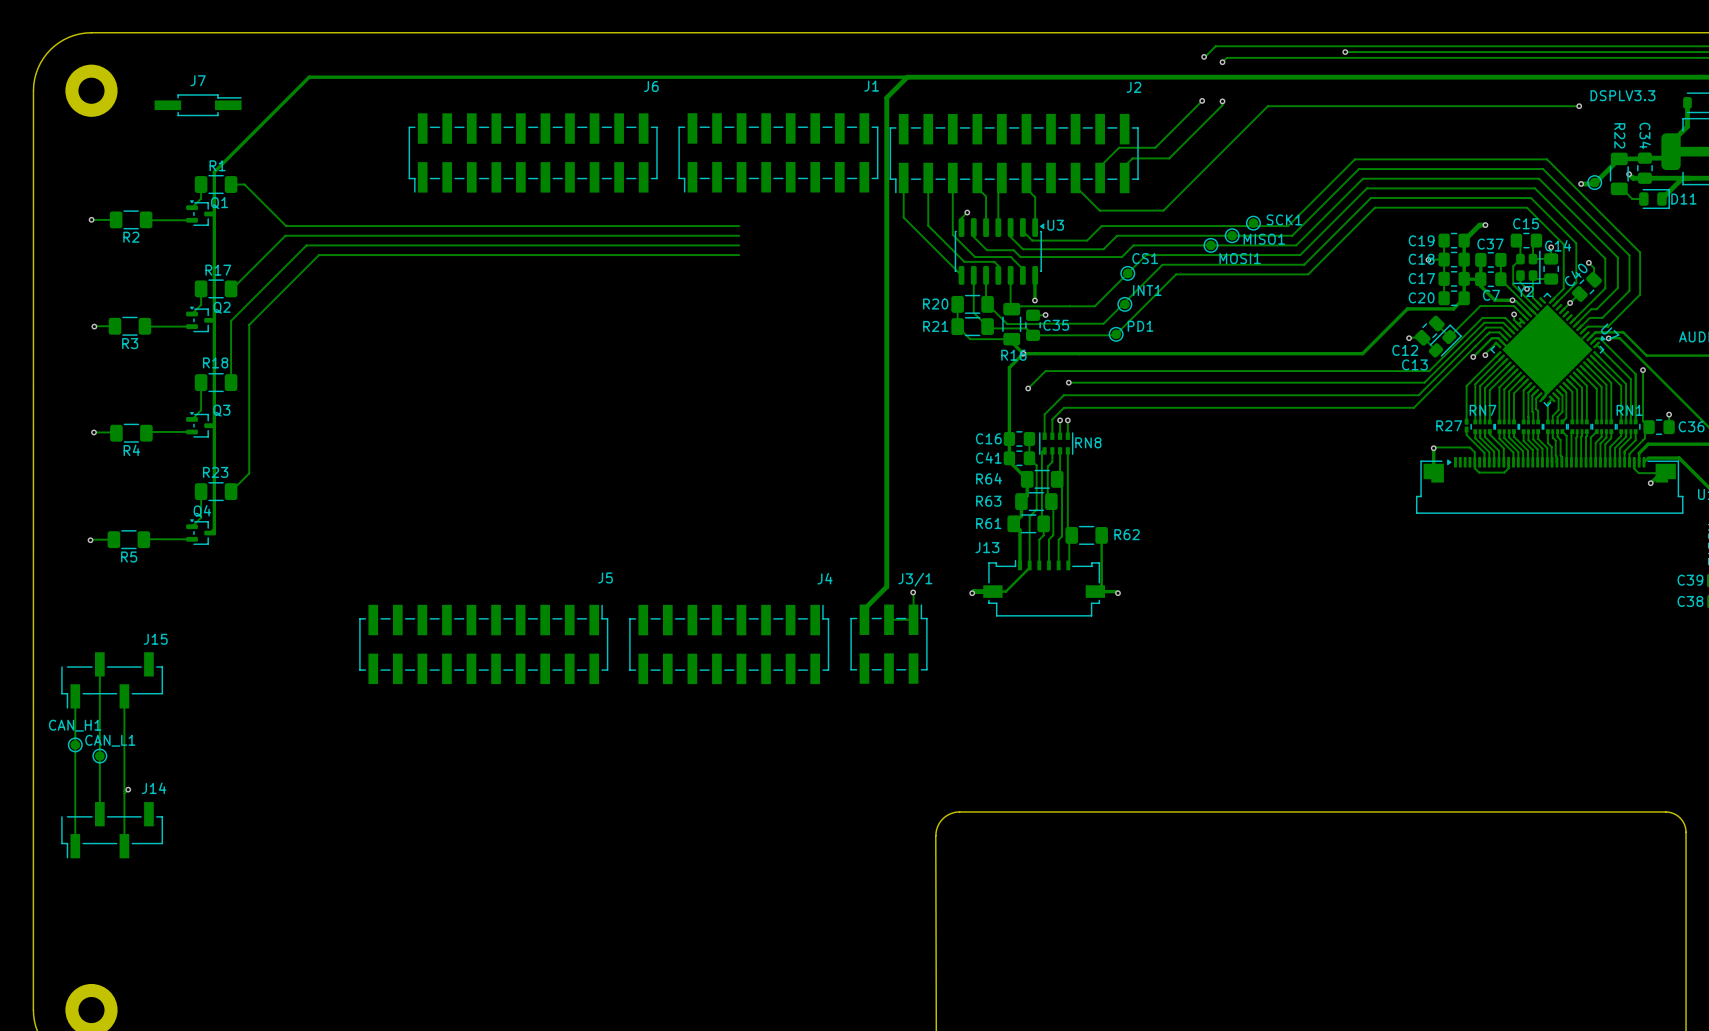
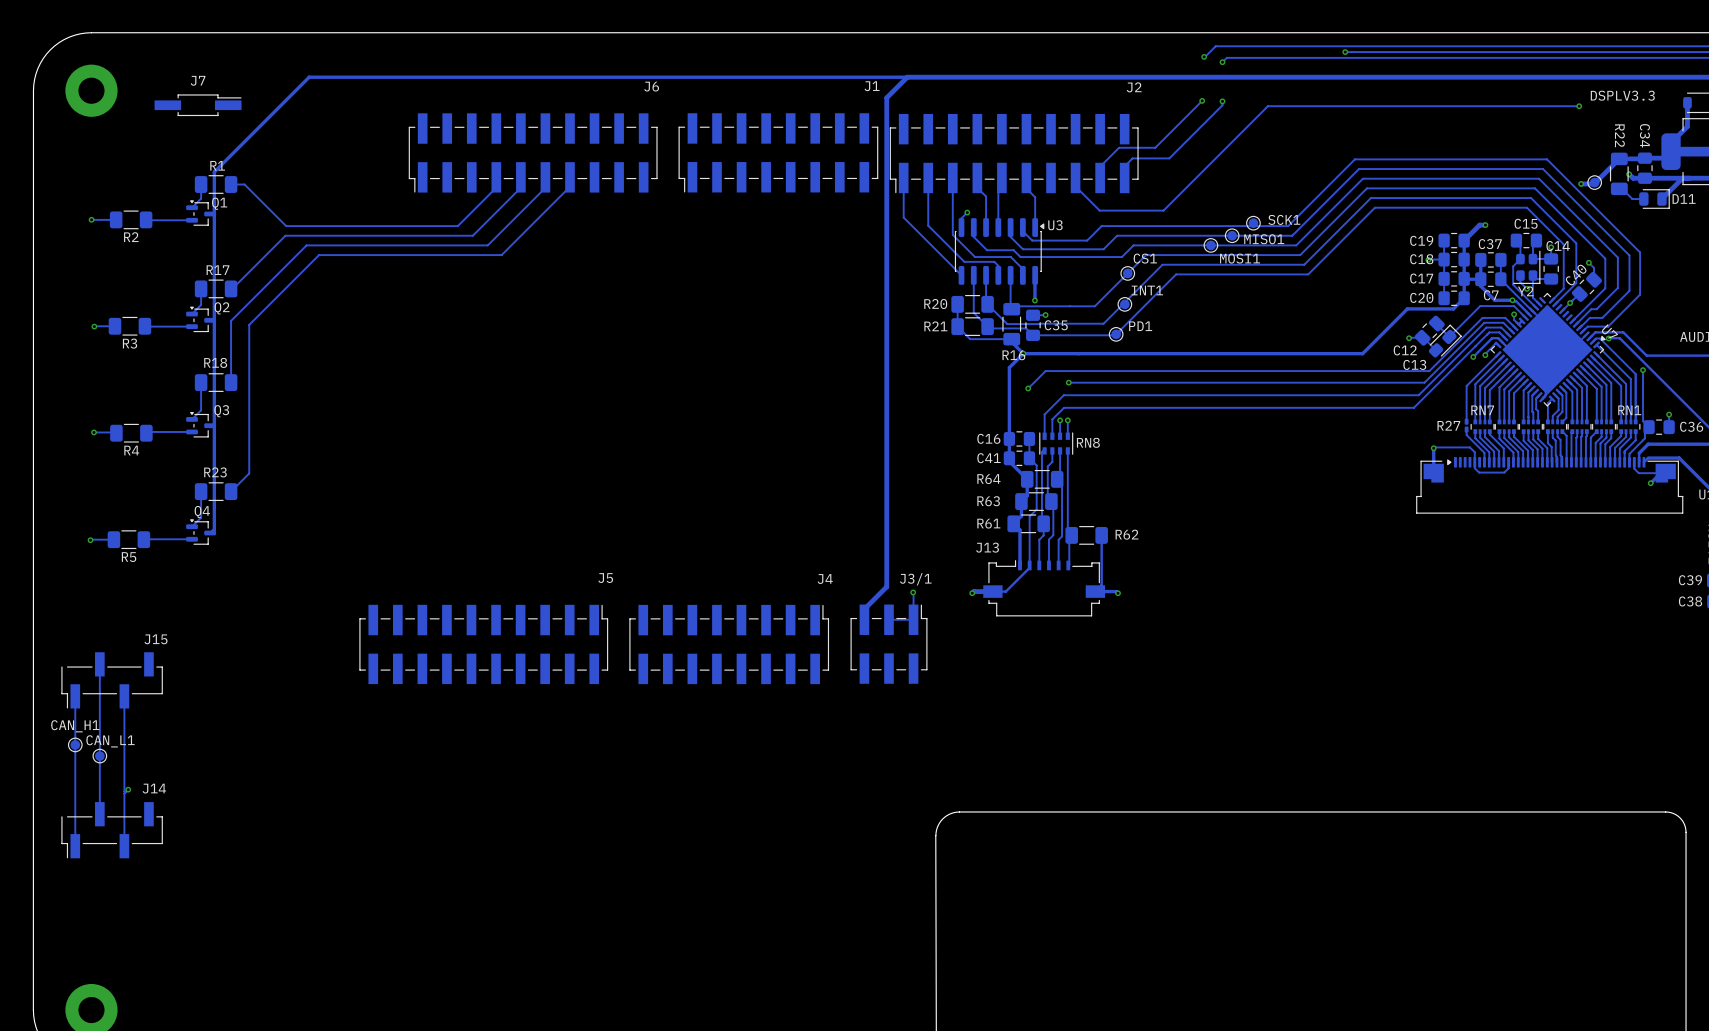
track: (739, 226) (457, 226) -> (496, 177) (496, 187) (457, 226)
track: (739, 235) (472, 235) -> (520, 177) (520, 187) (472, 235)
track: (739, 245) (487, 245) -> (545, 177) (545, 187) (487, 245)
track: (739, 255) (501, 255) -> (569, 177) (569, 186) (501, 255)

